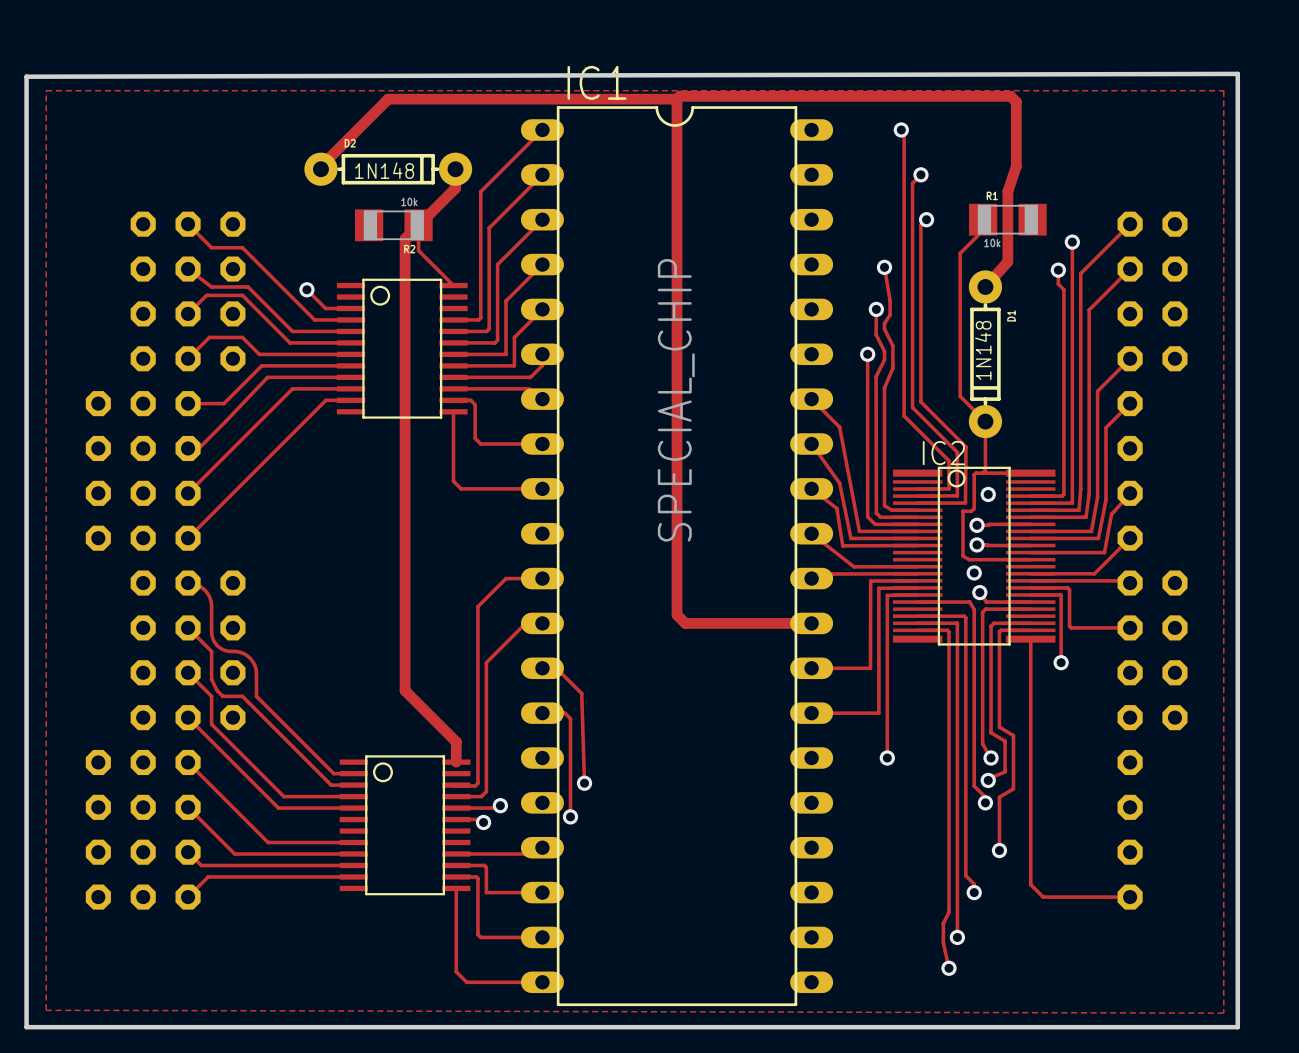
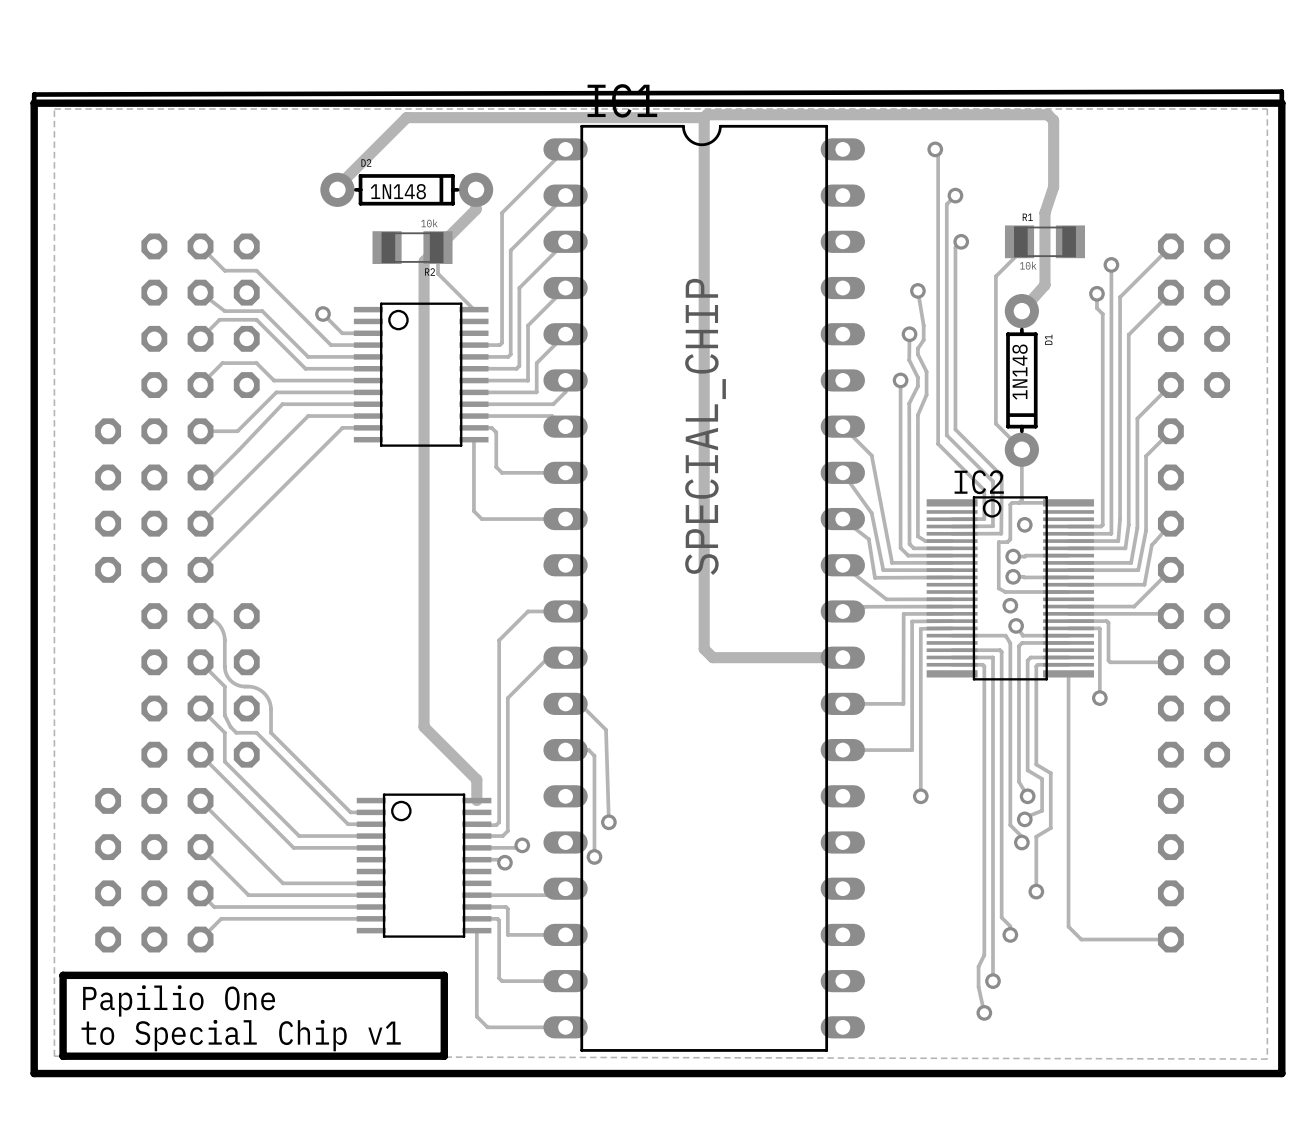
line: none -> (34, 103) (34, 1073) (1281, 1073) (1281, 103) (34, 103)
line: none -> (63, 975) (63, 1056) (444, 1056) (444, 975) (63, 975)
text: none -> Papilio One (179, 1000)
text: none -> to Special Chip v1 (241, 1035)

